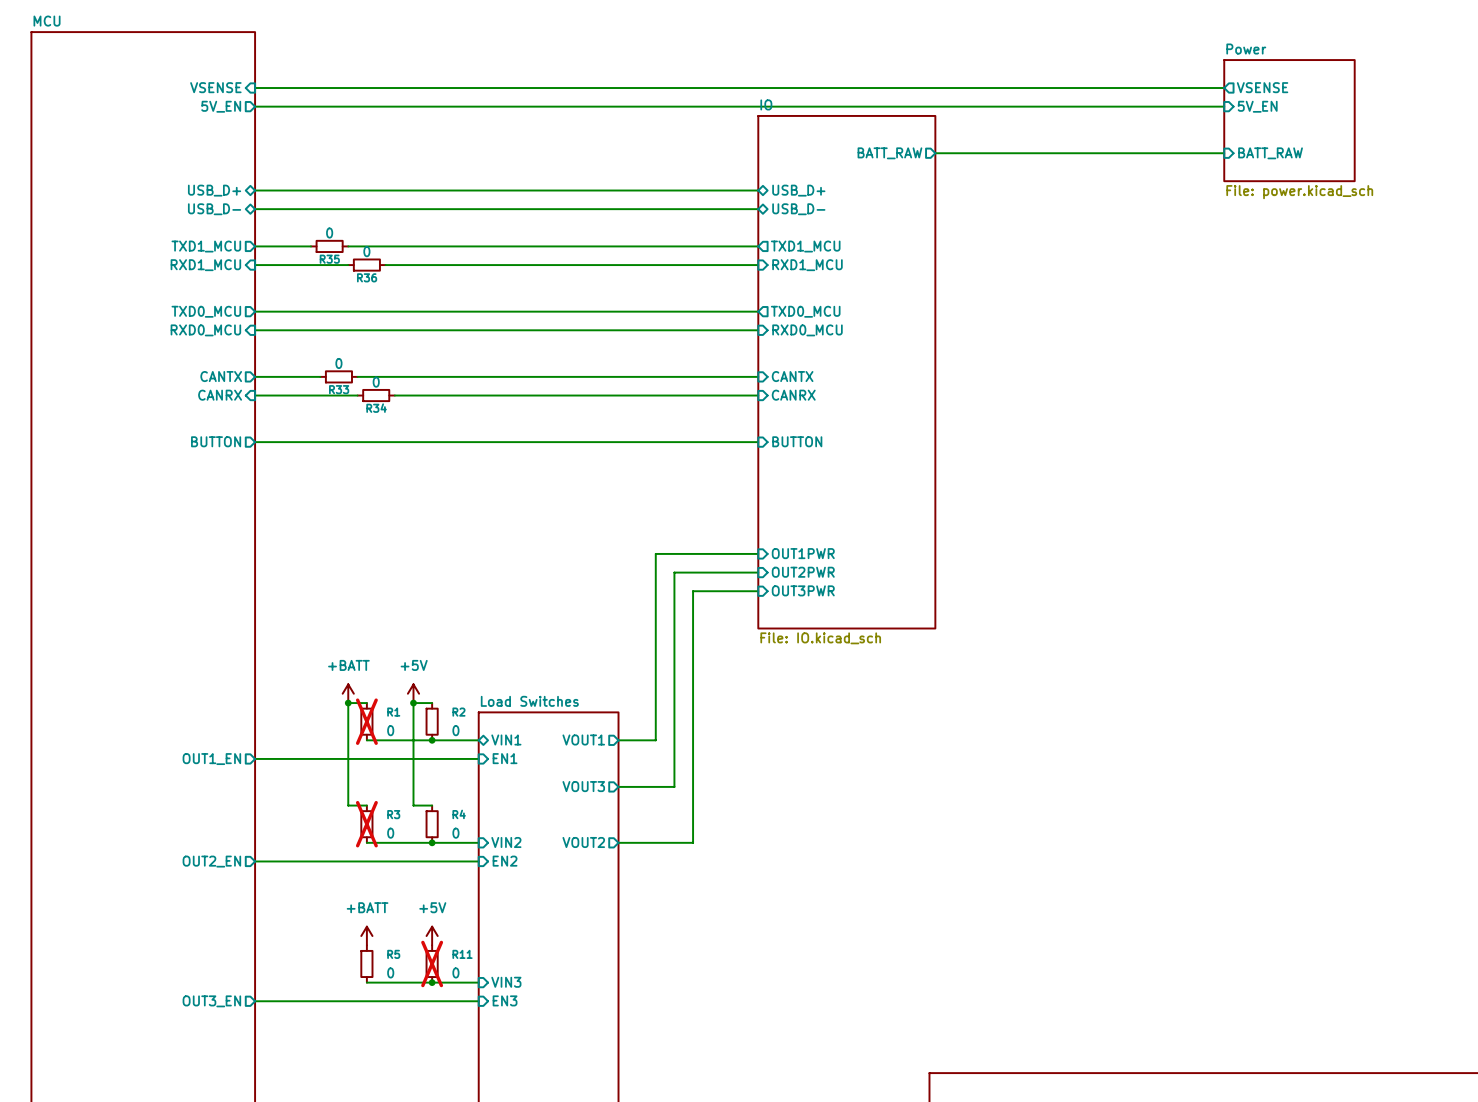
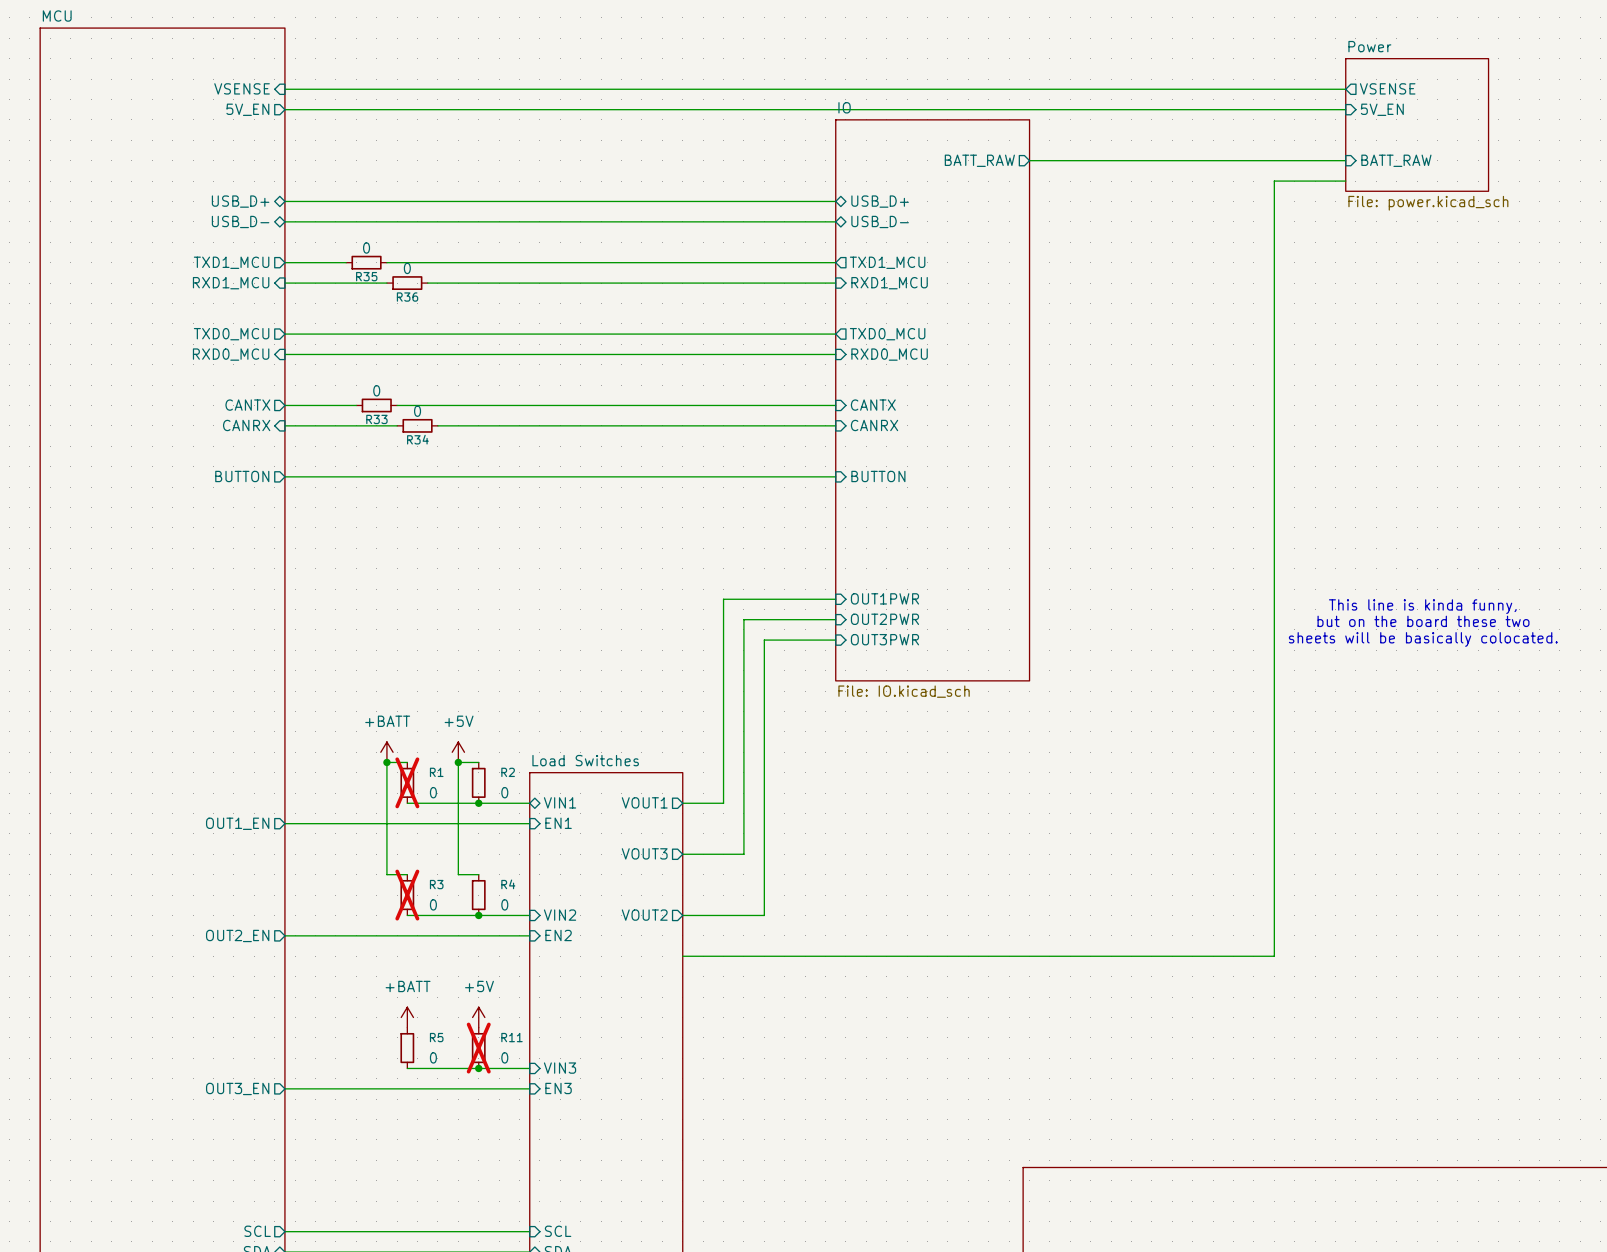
wire: none -> (1345, 181) (1274, 181) (1274, 956) (682, 956)
text: none -> This line is kinda funny, (1422, 606)
text: none -> but on the board these two (1423, 621)
text: none -> sheets will be basically colocated. (1423, 639)

